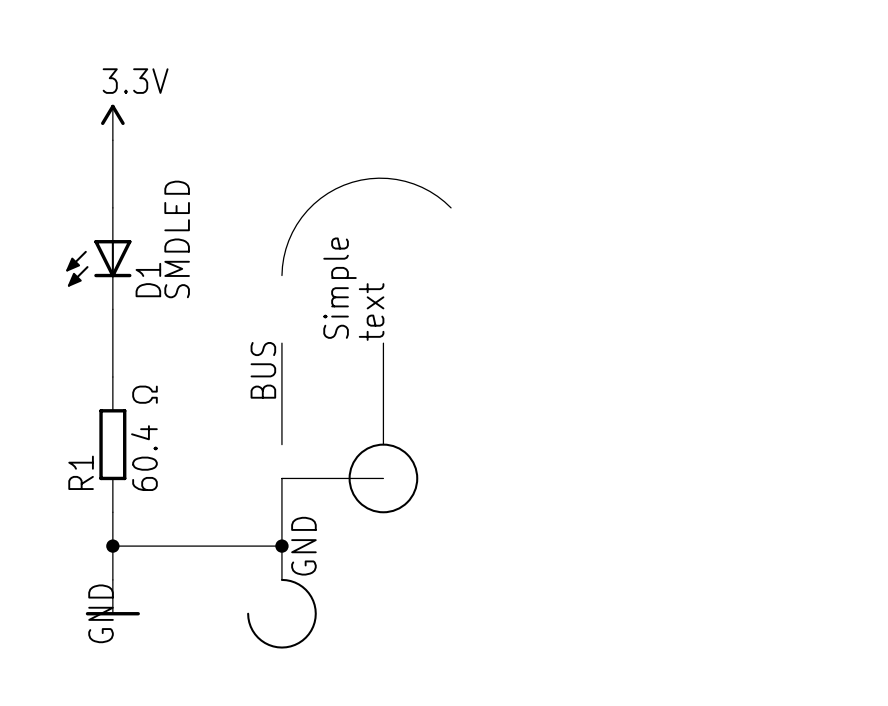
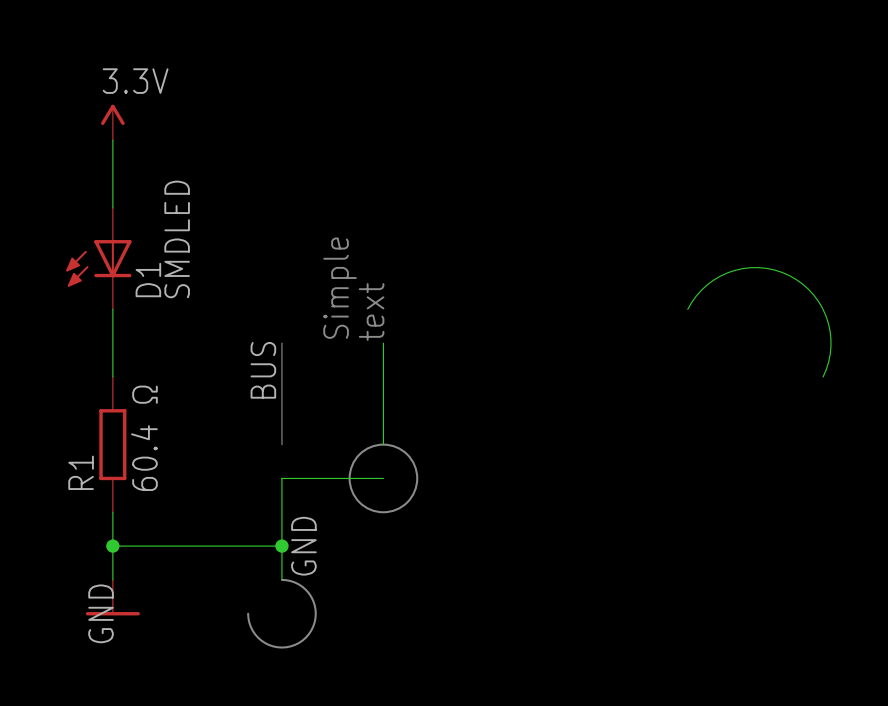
wire: (451, 207) (429, 191) (405, 181) (378, 178) (361, 180) (343, 185) (320, 198) (307, 210) (296, 224) (285, 249) (281, 275) -> none
wire: none -> (687, 309) (696, 296) (707, 284) (727, 272) (743, 268) (758, 267) (774, 269) (789, 275) (802, 284) (813, 295) (822, 308) (828, 323) (830, 346) (828, 362) (823, 376)

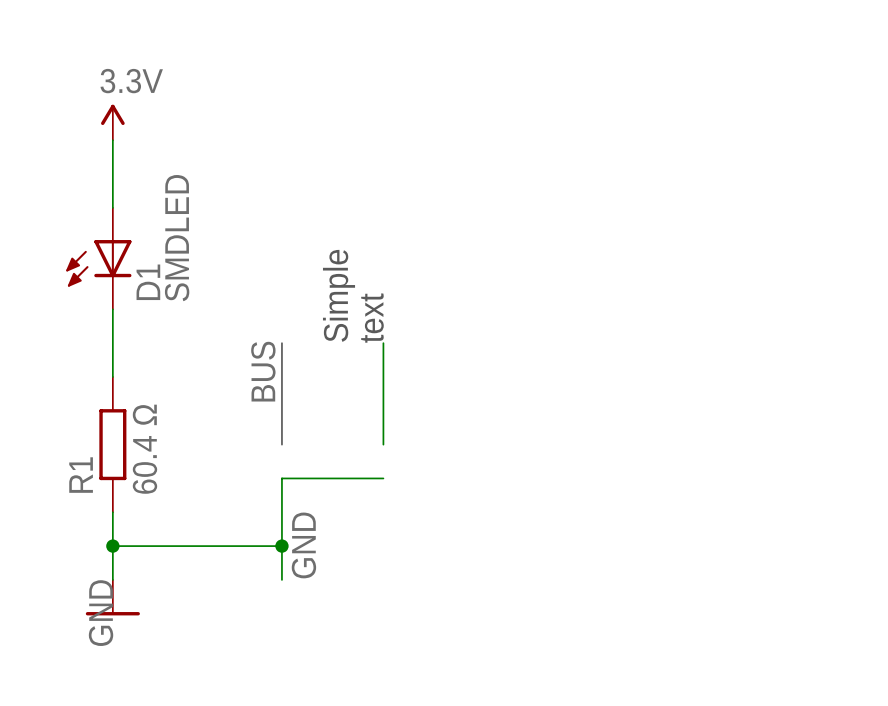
wire: (687, 309) (696, 296) (707, 284) (727, 272) (743, 268) (758, 267) (774, 269) (789, 275) (802, 284) (813, 295) (822, 308) (828, 323) (830, 346) (828, 362) (823, 376) -> none
drawing: [348, 443, 419, 514] -> none
line: (281, 579) (290, 581) (302, 586) (313, 600) (315, 609) (314, 622) (305, 637) (290, 646) (277, 647) (269, 644) (255, 634) (249, 622) (248, 613) -> none

